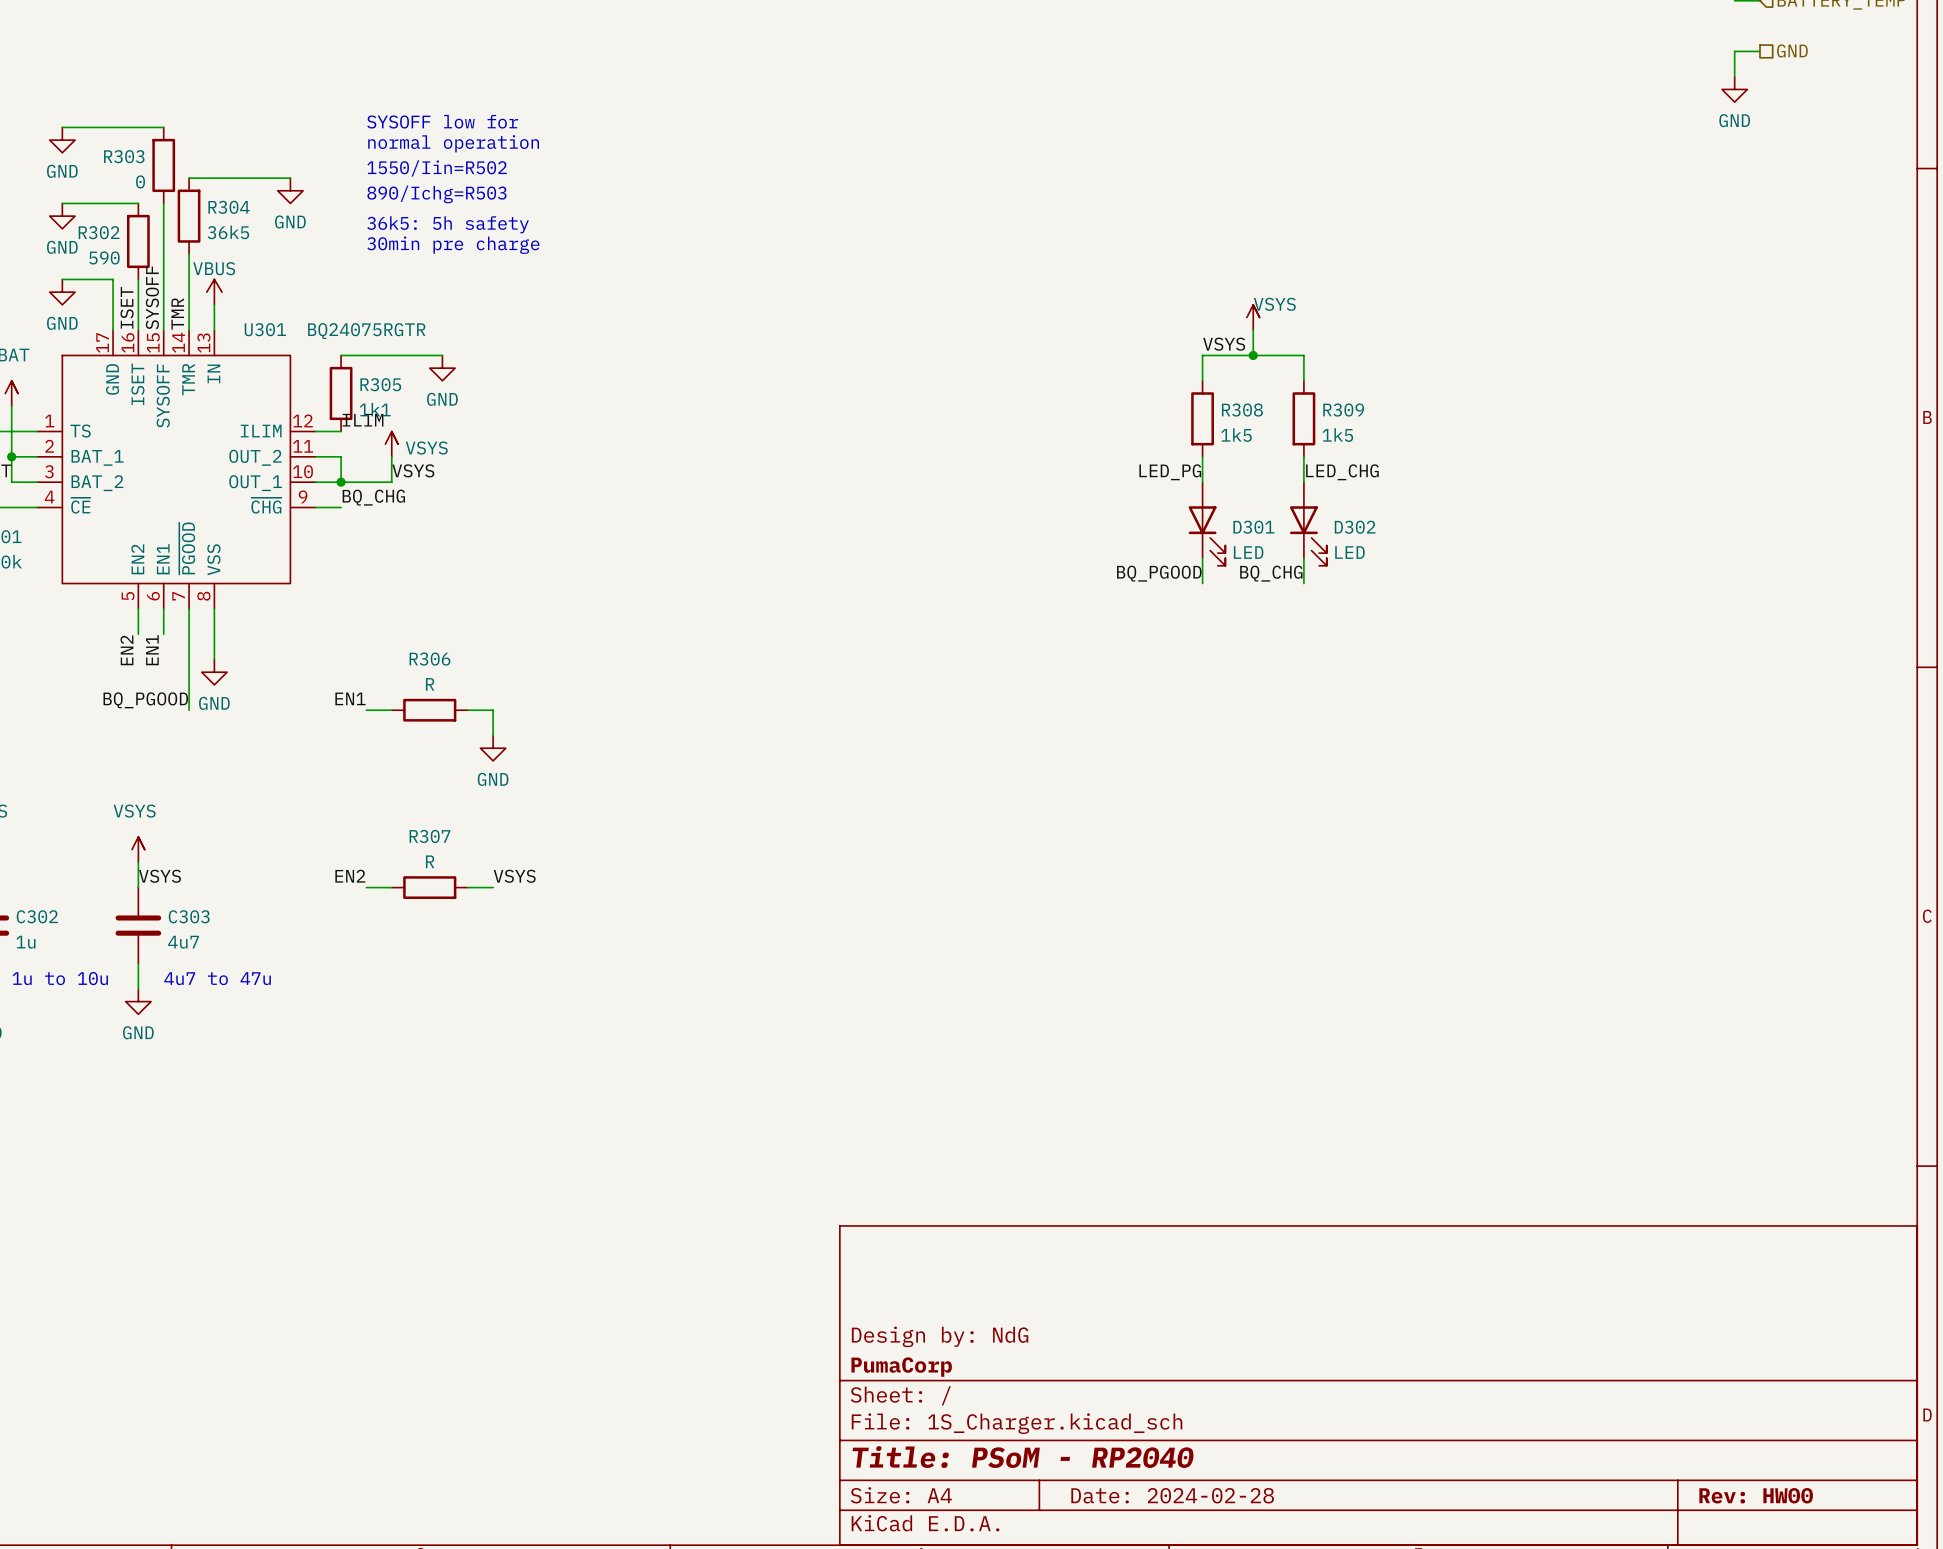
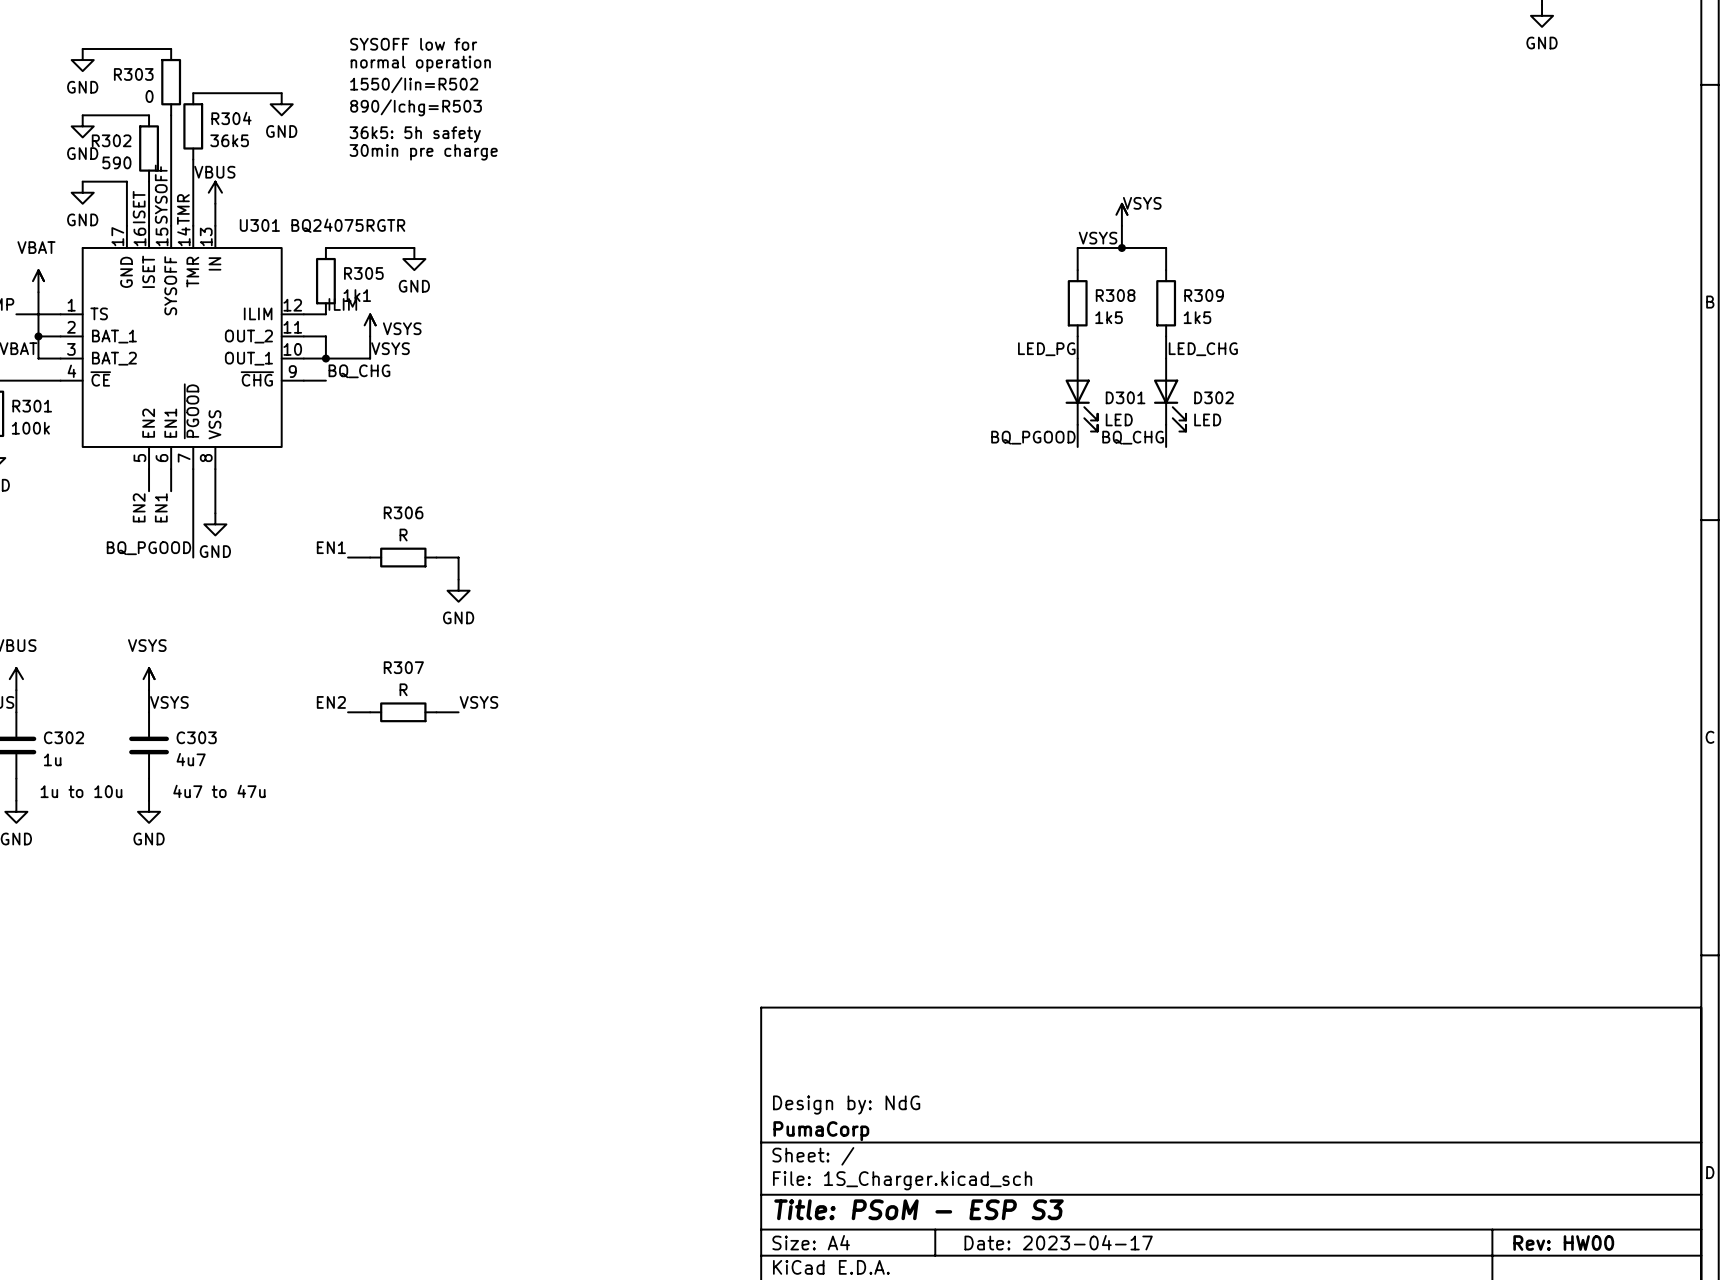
title block: Title: PSoM - RP2040 (1023, 1457) -> Title: PSoM - ESP S3 (919, 1209)
title block: Date: 2024-02-28 (1172, 1495) -> Date: 2023-04-17 (1058, 1242)

